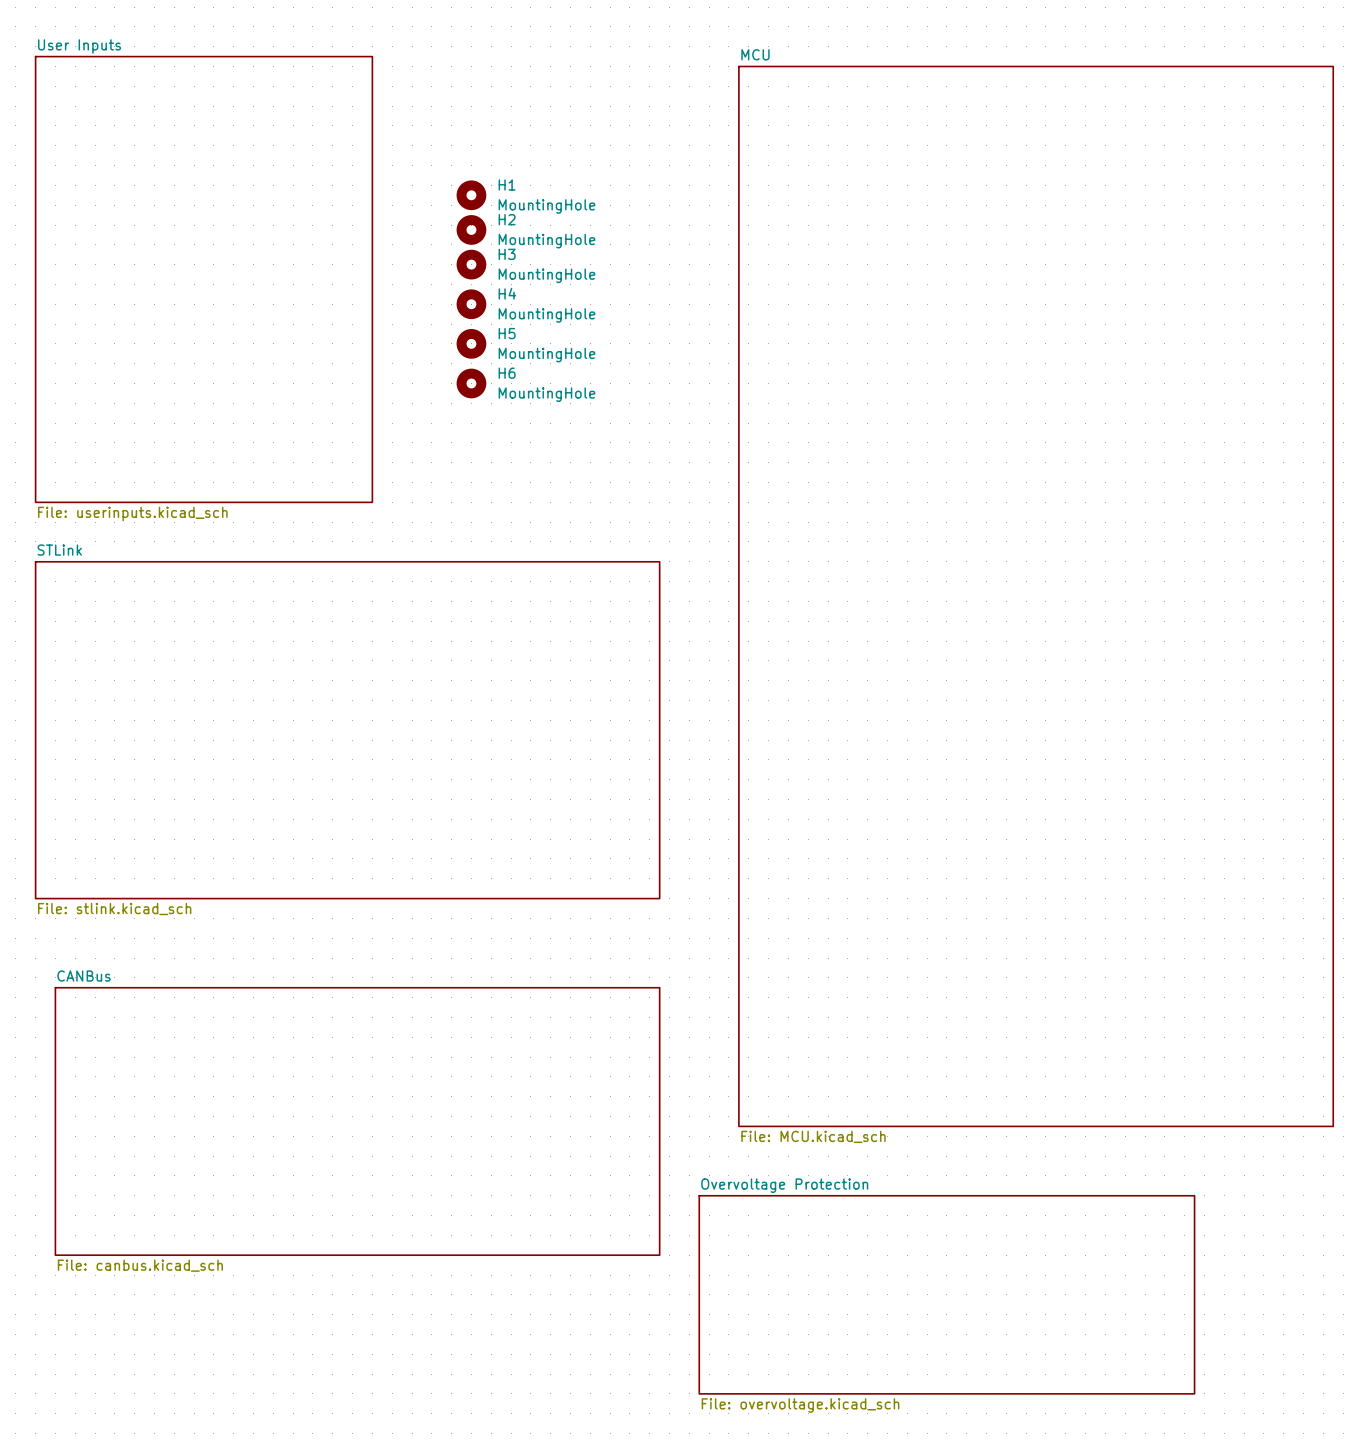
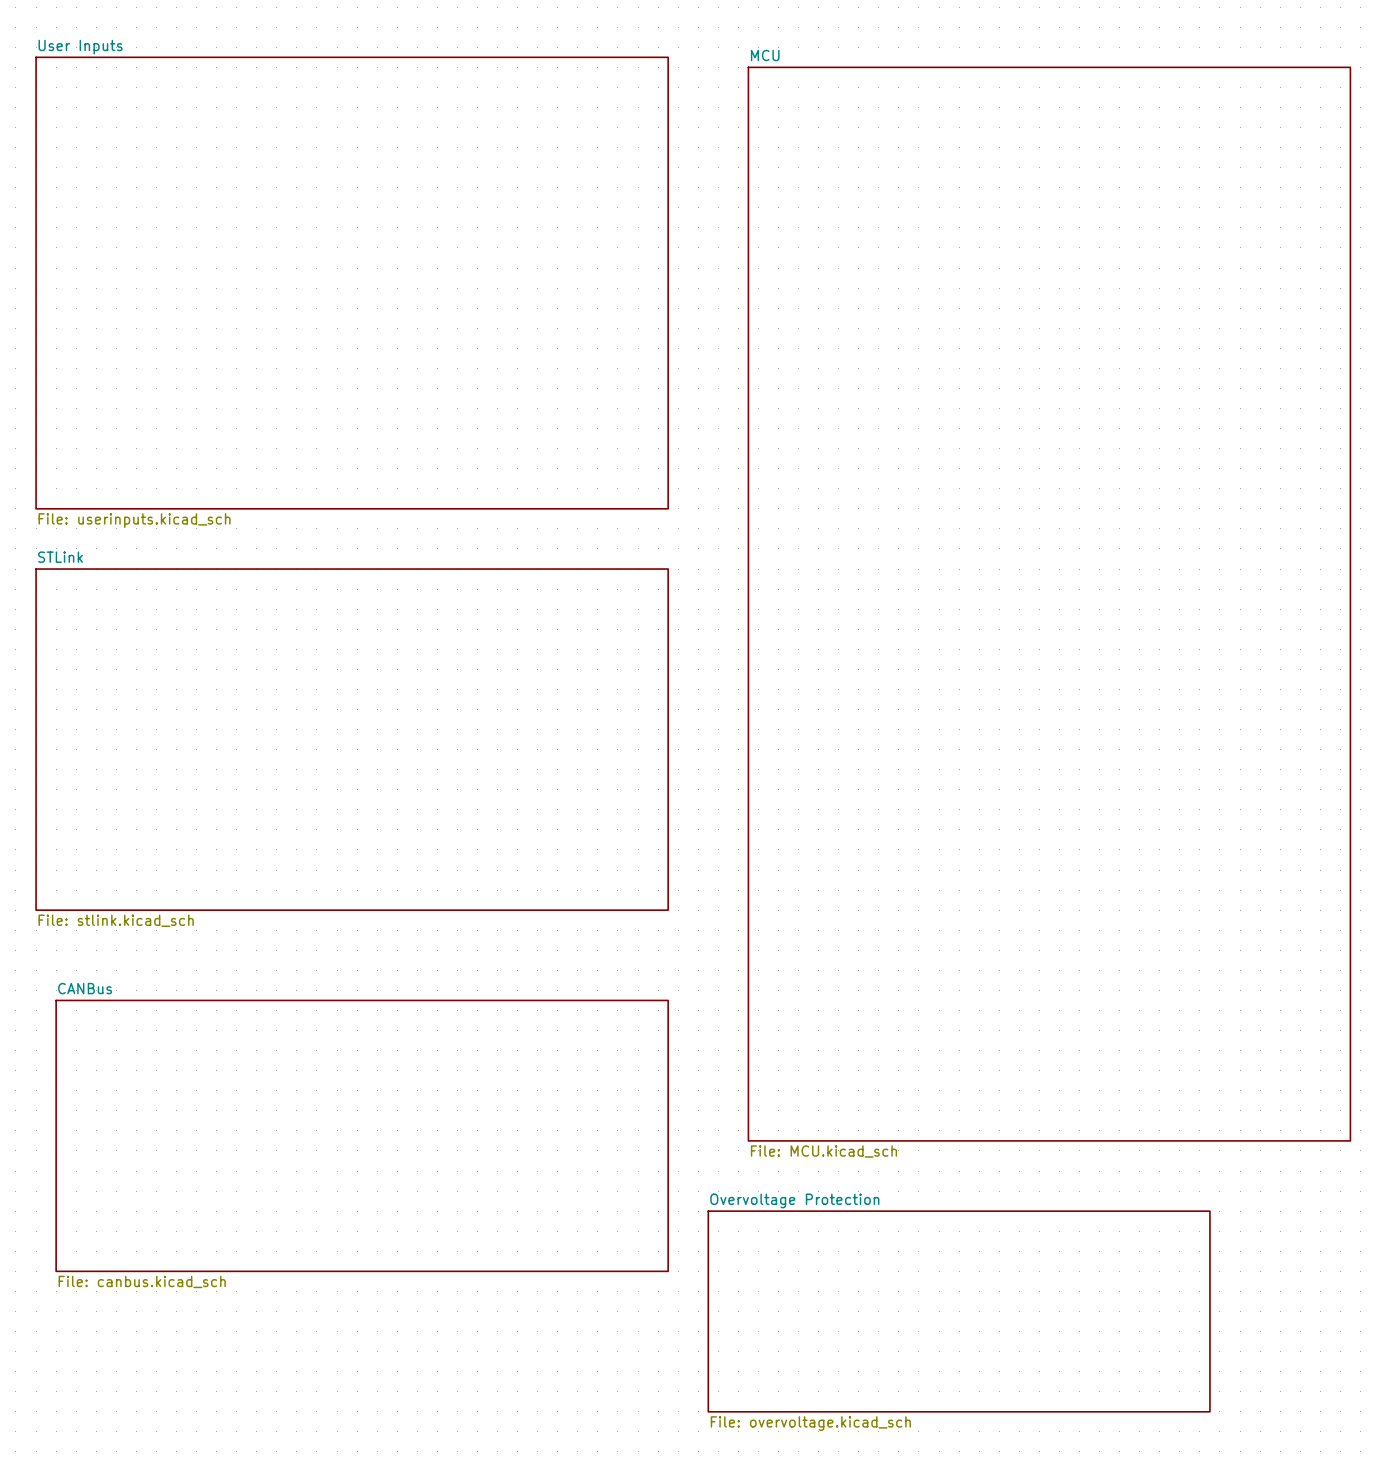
H1: MountingHole (471, 195) -> none
H2: MountingHole (471, 229) -> none
H3: MountingHole (471, 264) -> none
sheet User Inputs: File: userinputs.kicad_sch (203, 279) -> none
sheet User Inputs: none -> File: userinputs.kicad_sch (352, 283)
H4: MountingHole (471, 304) -> none
H5: MountingHole (471, 343) -> none
H6: MountingHole (471, 383) -> none

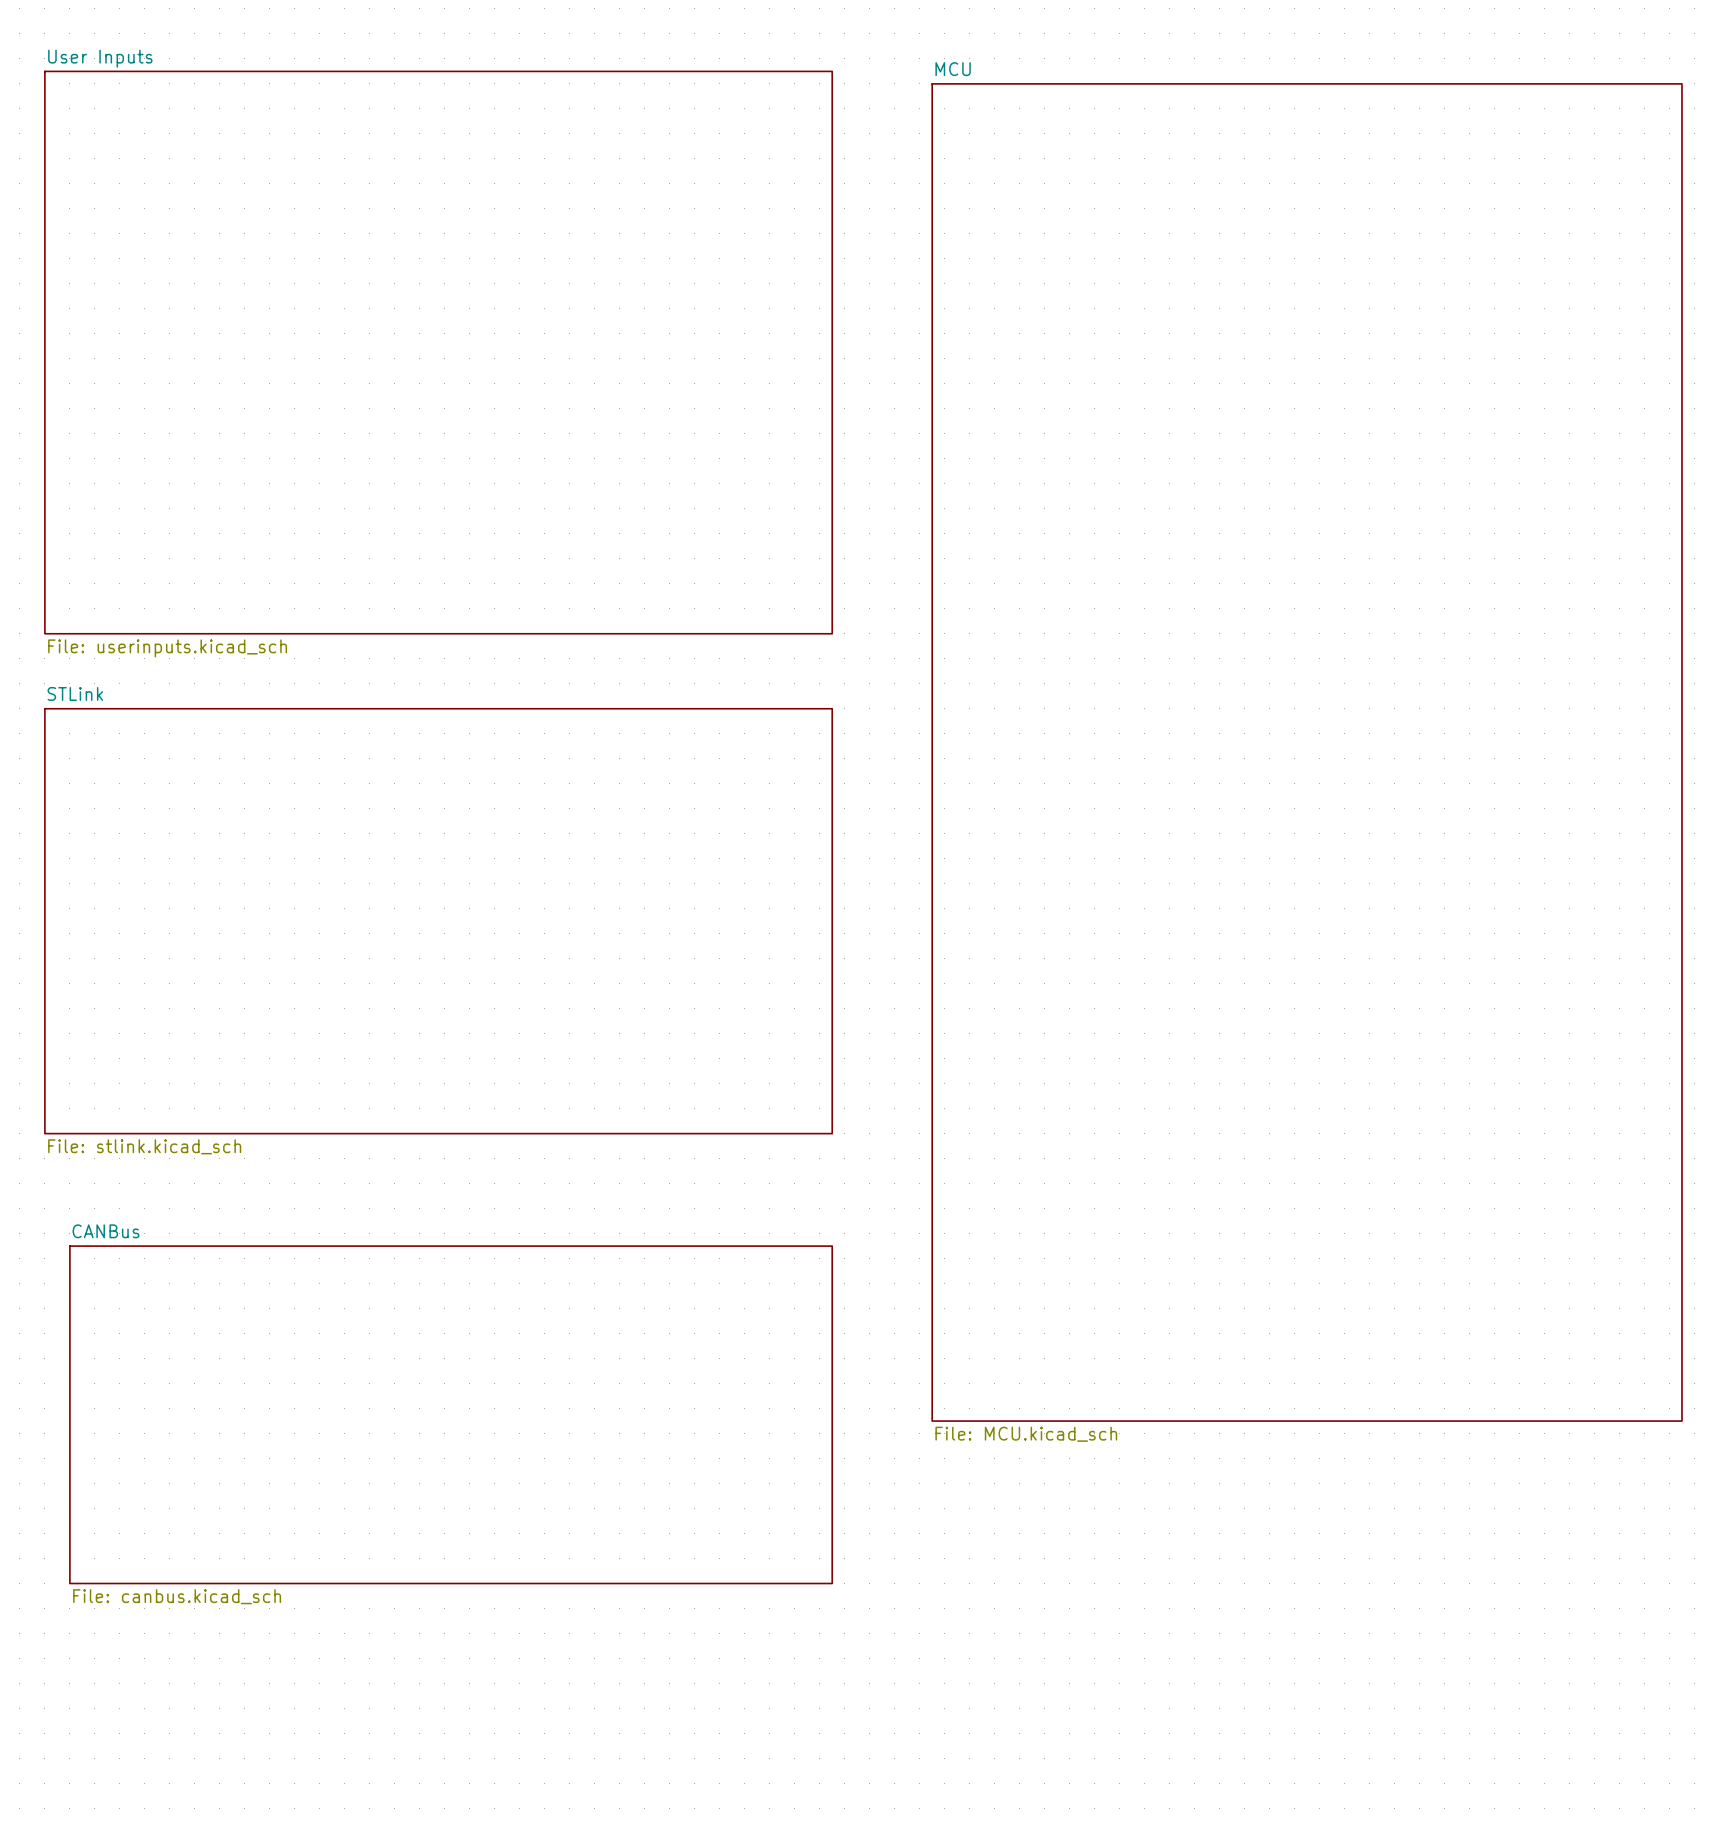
sheet Overvoltage Protection: File: overvoltage.kicad_sch (959, 1311) -> none

